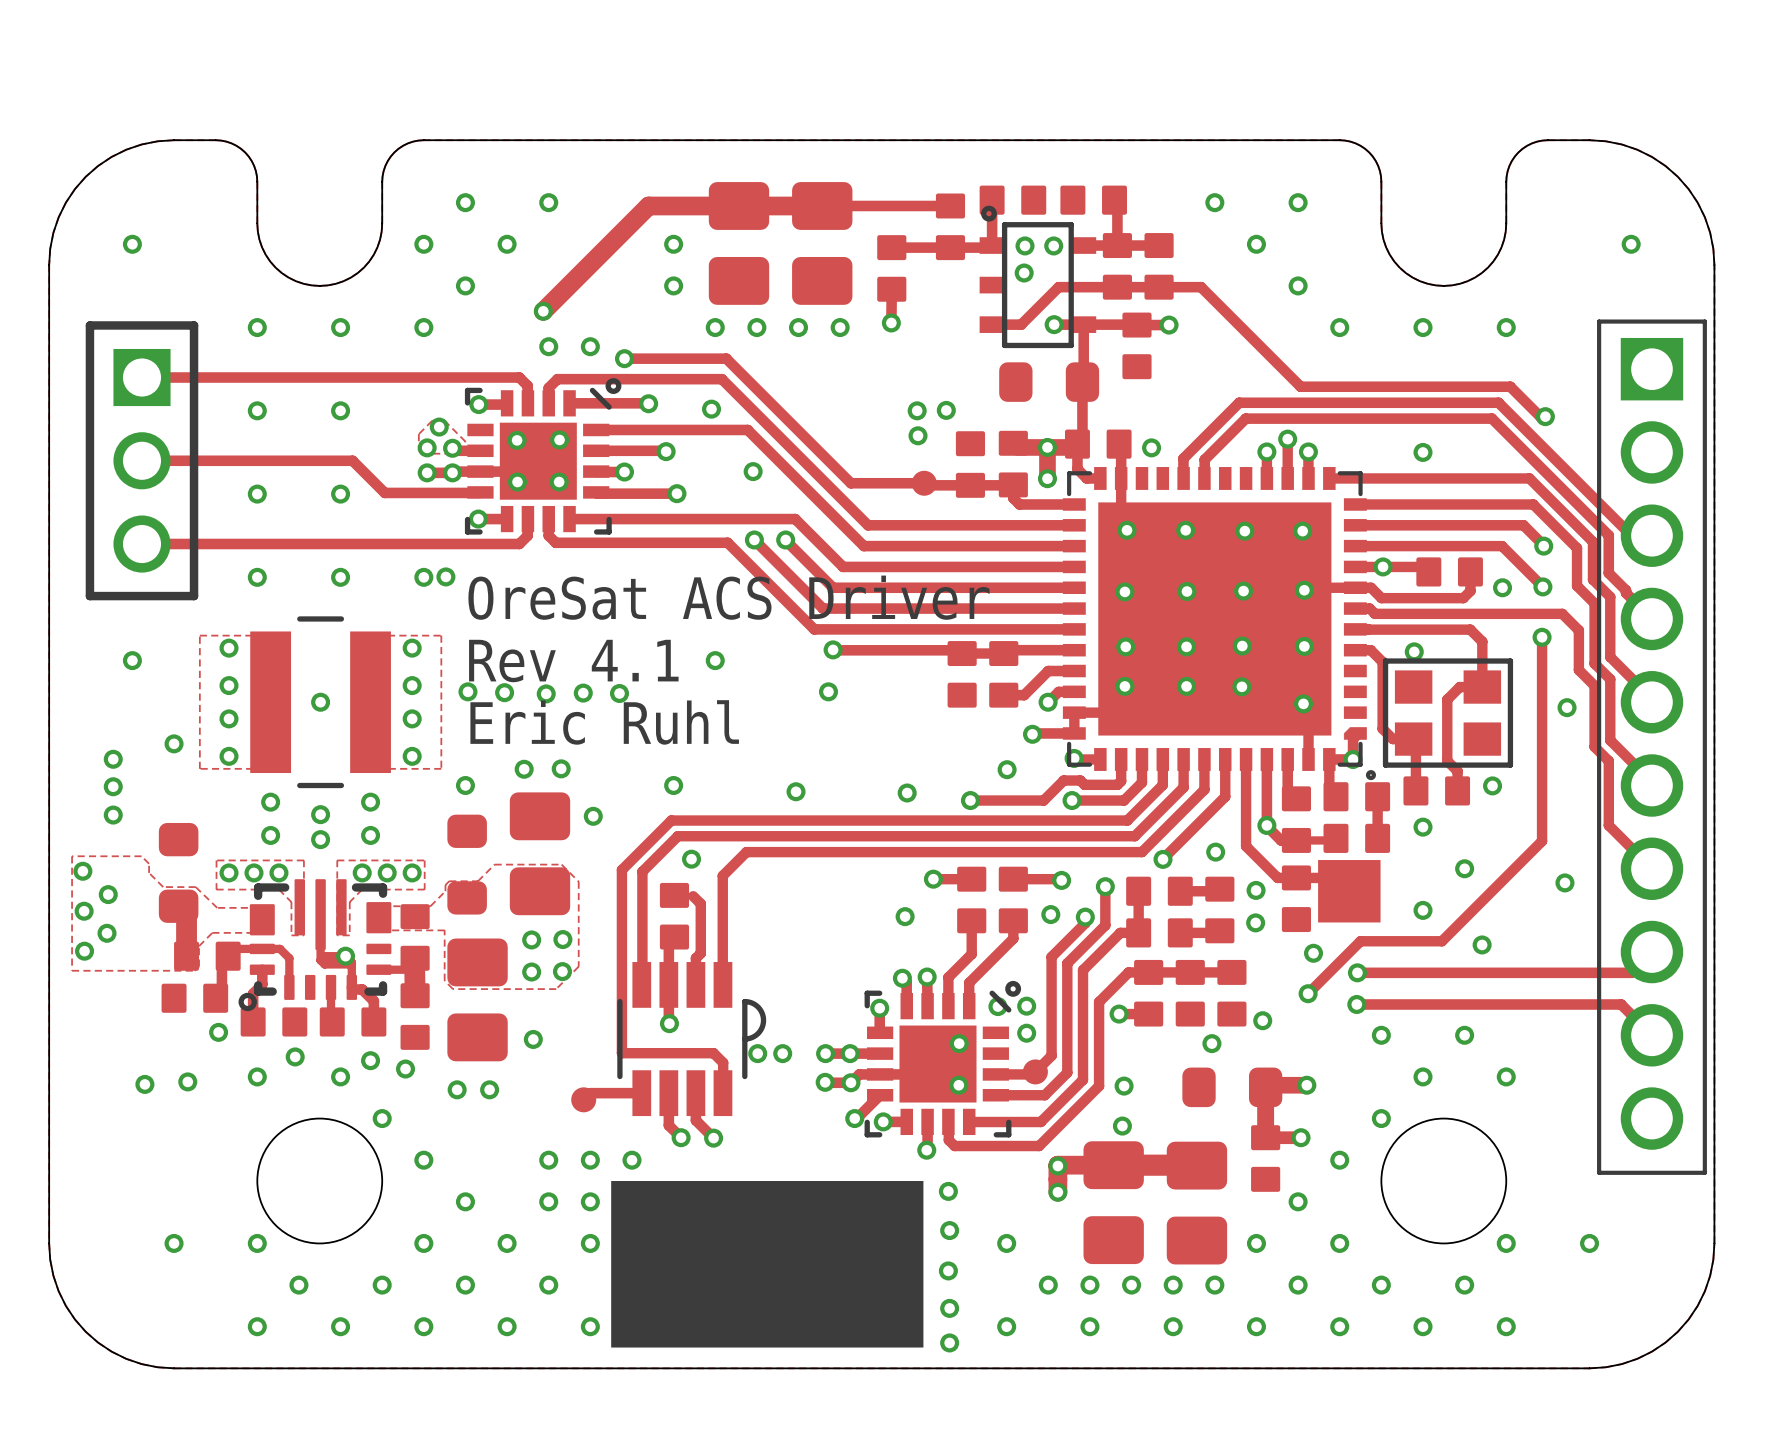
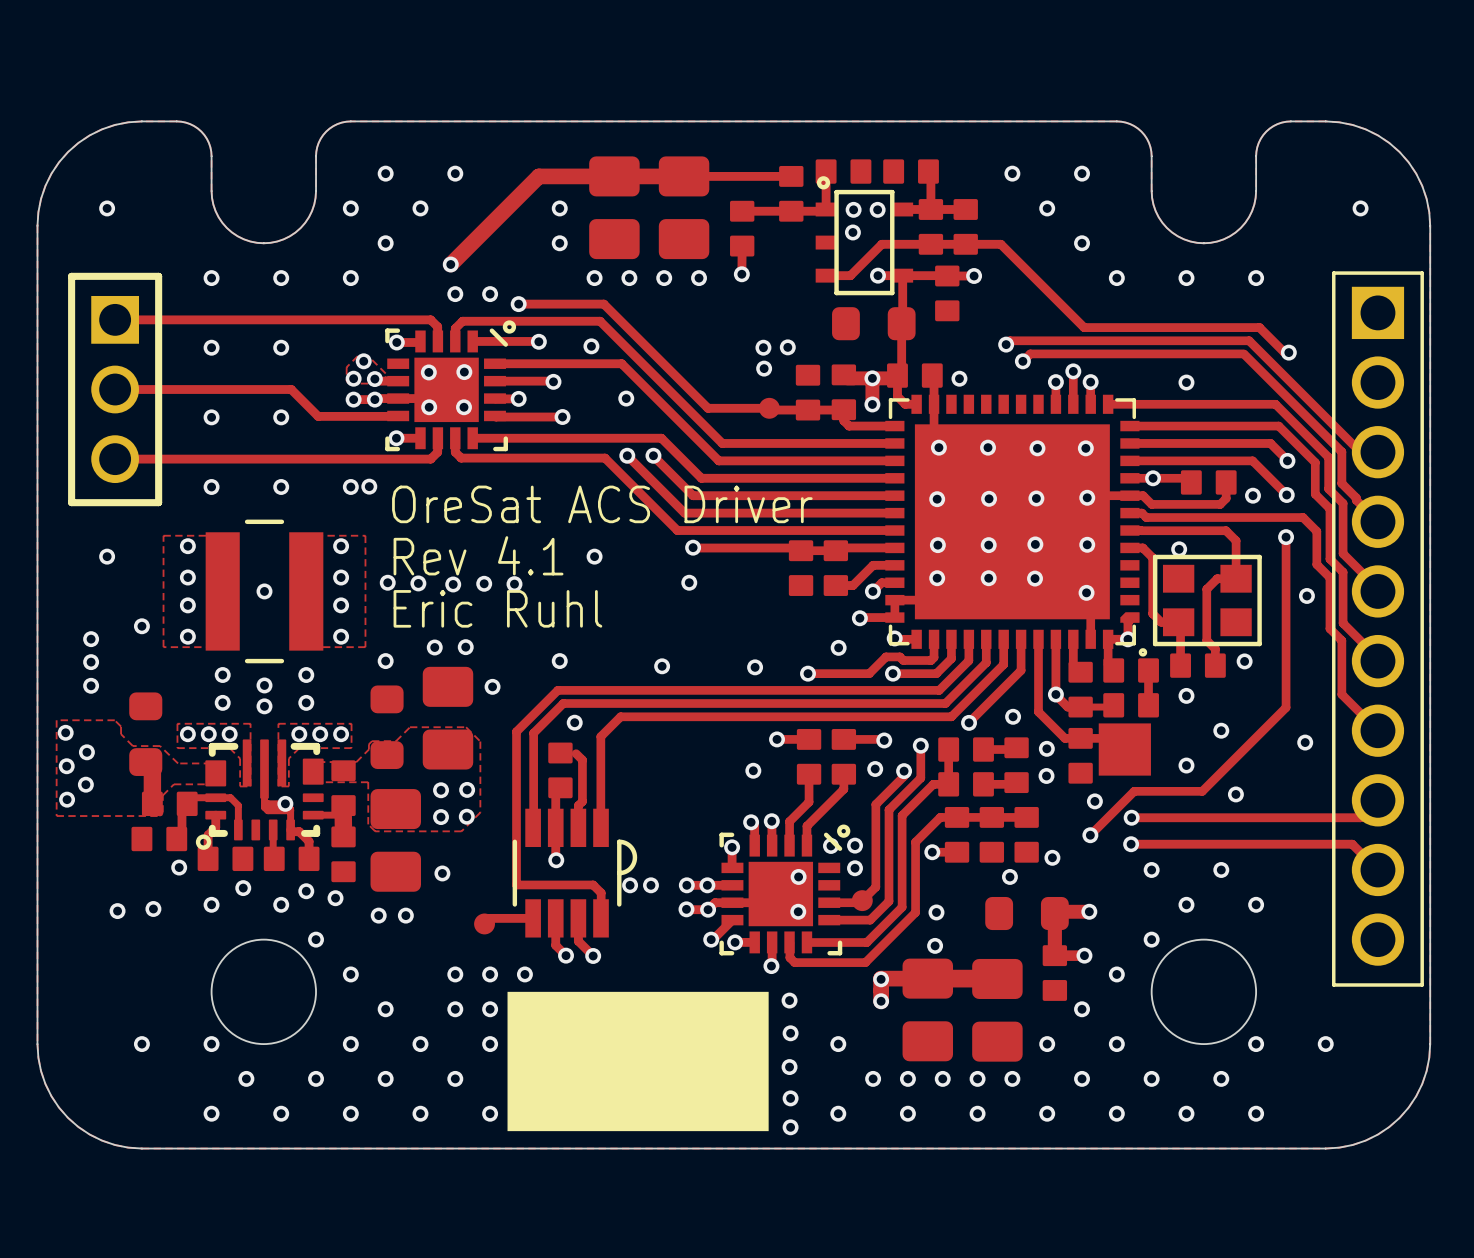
via: none -> (1006, 344)
track: (1491, 418) (1245, 418) (1204, 459) (1204, 478) -> (1243, 353) (1030, 353) (1022, 361)
via: none -> (1022, 361)
track: (1183, 478) (1183, 458) (1239, 402) (1498, 402) (1631, 535) -> (1006, 344) (1009, 340) (1249, 340) (1360, 452)

